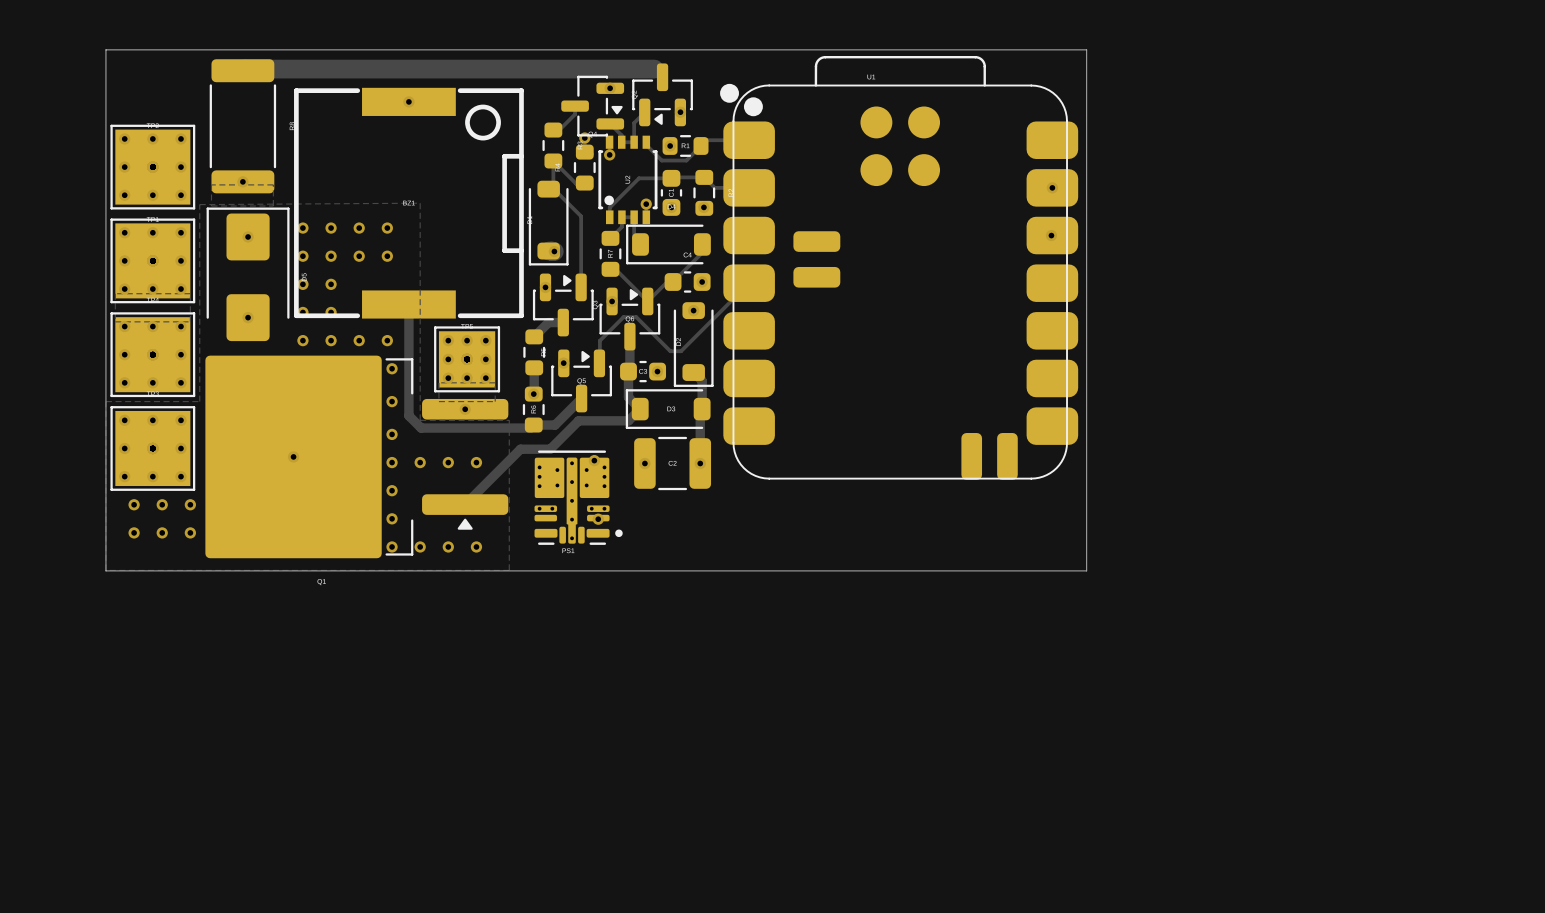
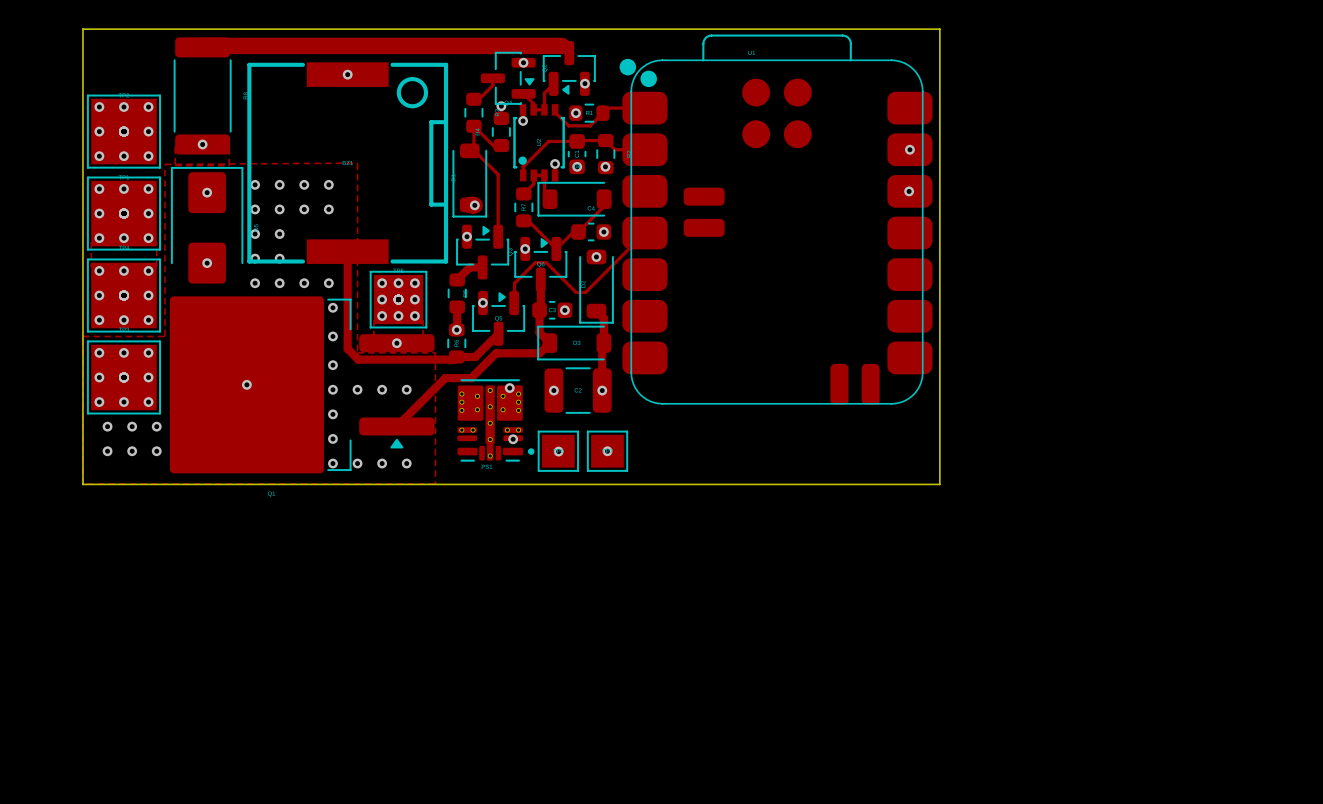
part: none -> (558, 451)
part: none -> (607, 451)
via: none -> (607, 451)
via: none -> (558, 451)

